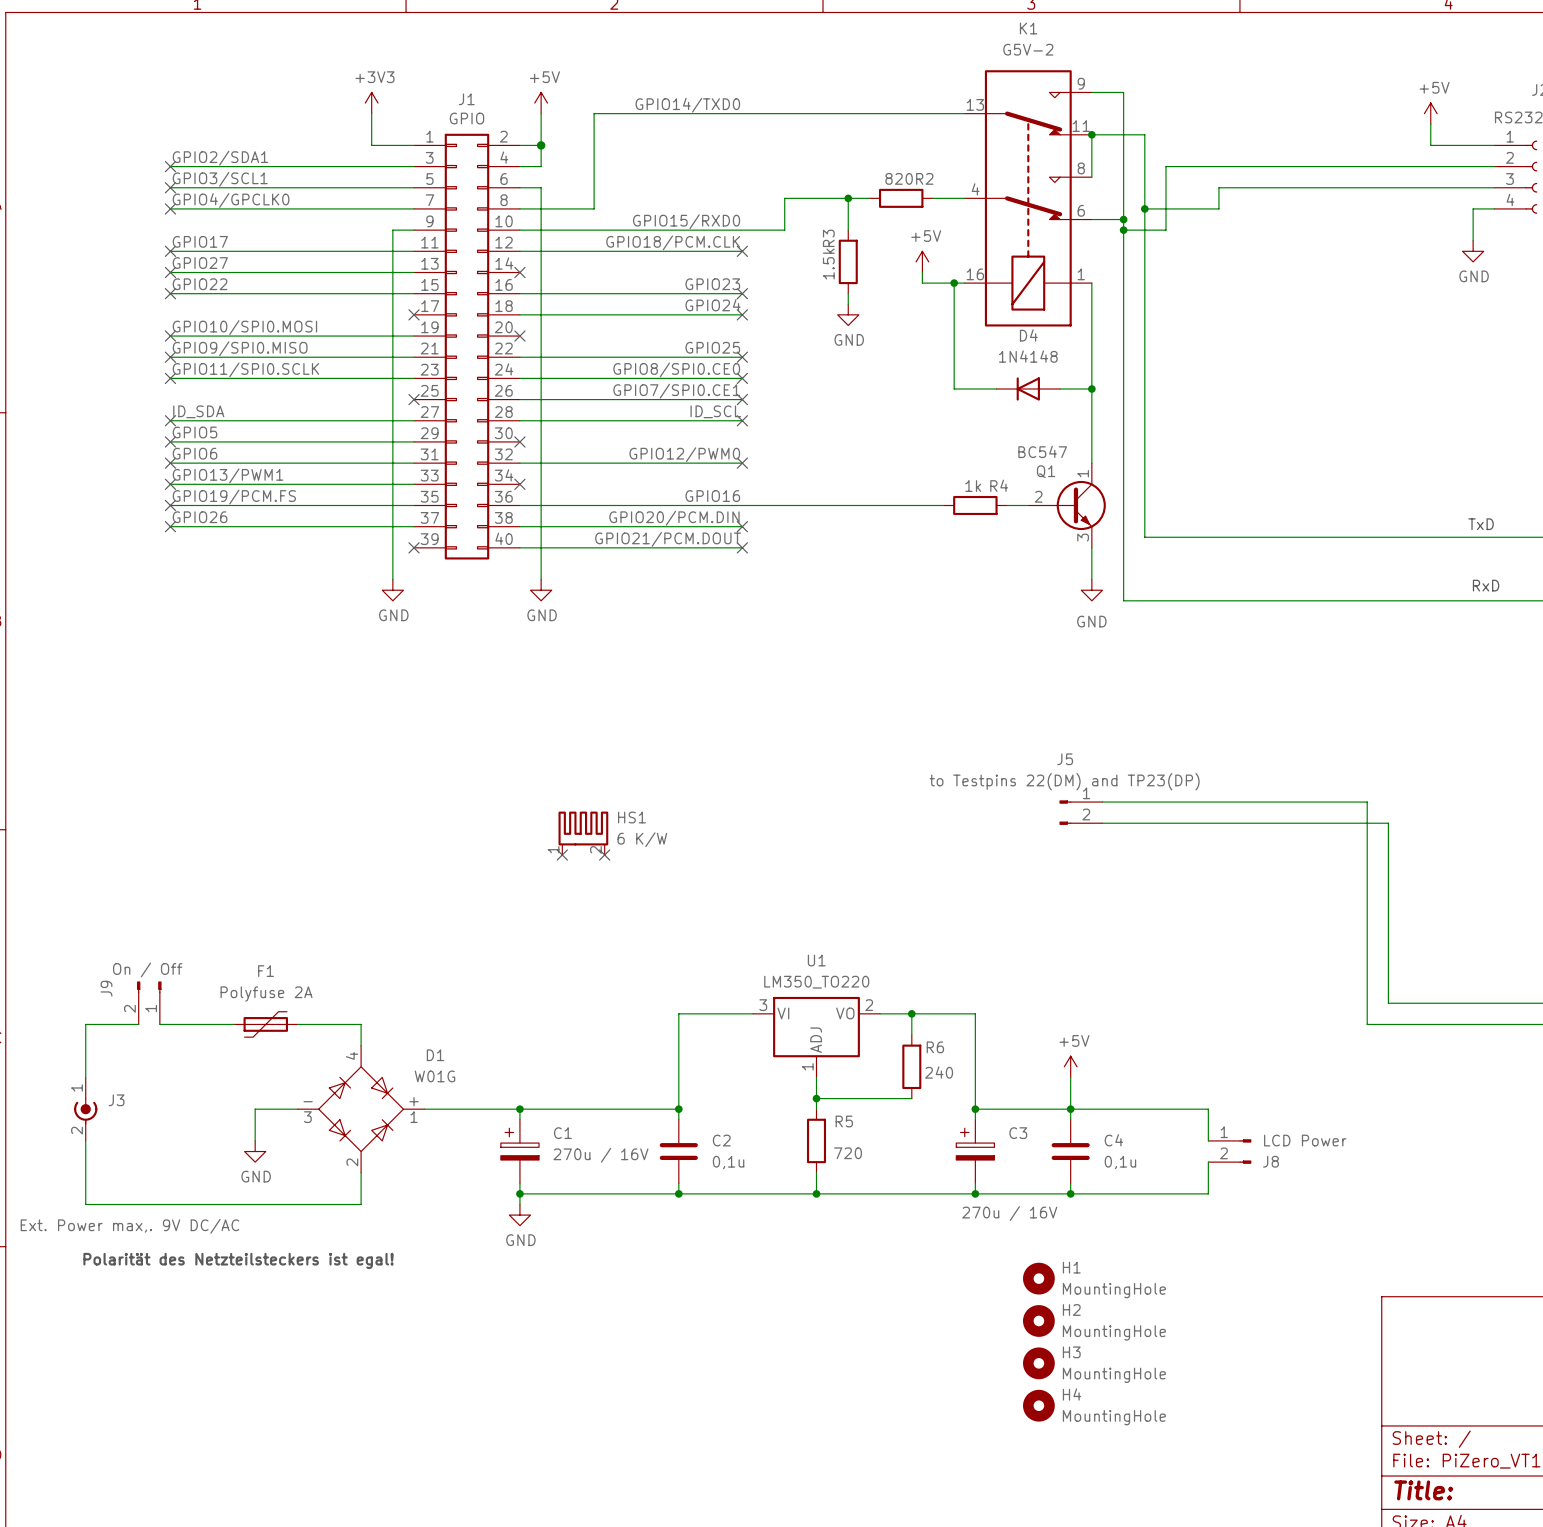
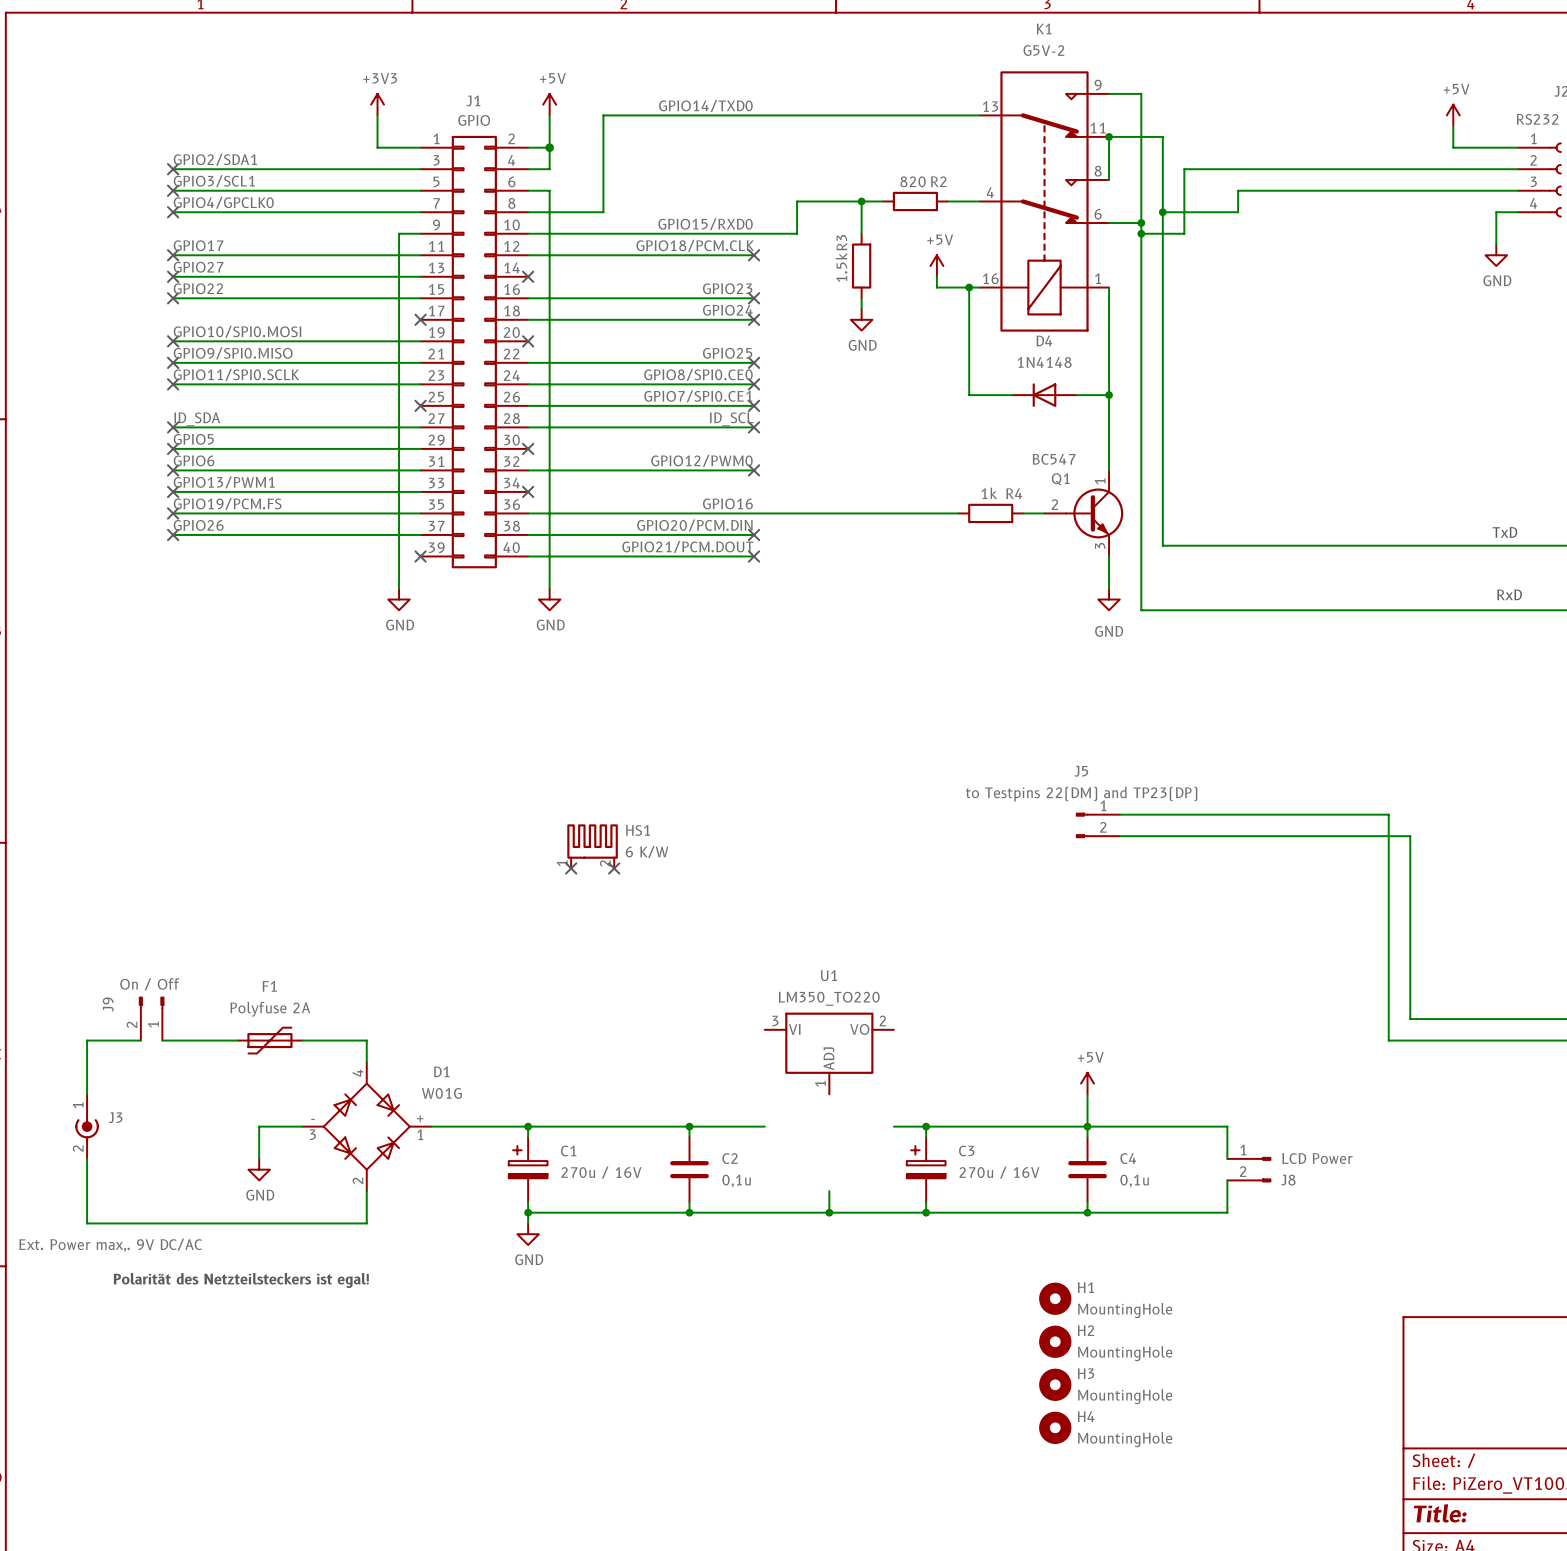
wire: (752, 1013) (678, 1013) (678, 1109) -> (764, 1126) (689, 1126)
wire: (880, 1013) (975, 1013) (975, 1119) -> none
wire: (911, 1013) (911, 1035) -> none
junction: (911, 1013) -> none
R6: 240 (911, 1066) -> none
wire: (816, 1077) (816, 1109) -> none
wire: (816, 1098) (911, 1098) -> (893, 1126) (990, 1126)
junction: (816, 1098) -> none
wire: none -> (926, 1126) (926, 1137)
junction: none -> (926, 1126)
junction: (975, 1109) -> none
R5: 720 (816, 1140) -> none
C3 position: (975, 1151) -> (926, 1169)
wire: (975, 1183) (975, 1193) -> (926, 1201) (926, 1212)
junction: none -> (926, 1212)
junction: (975, 1193) -> none
C3 value position: 270u / 16V (1009, 1213) -> 270u / 16V (999, 1172)

